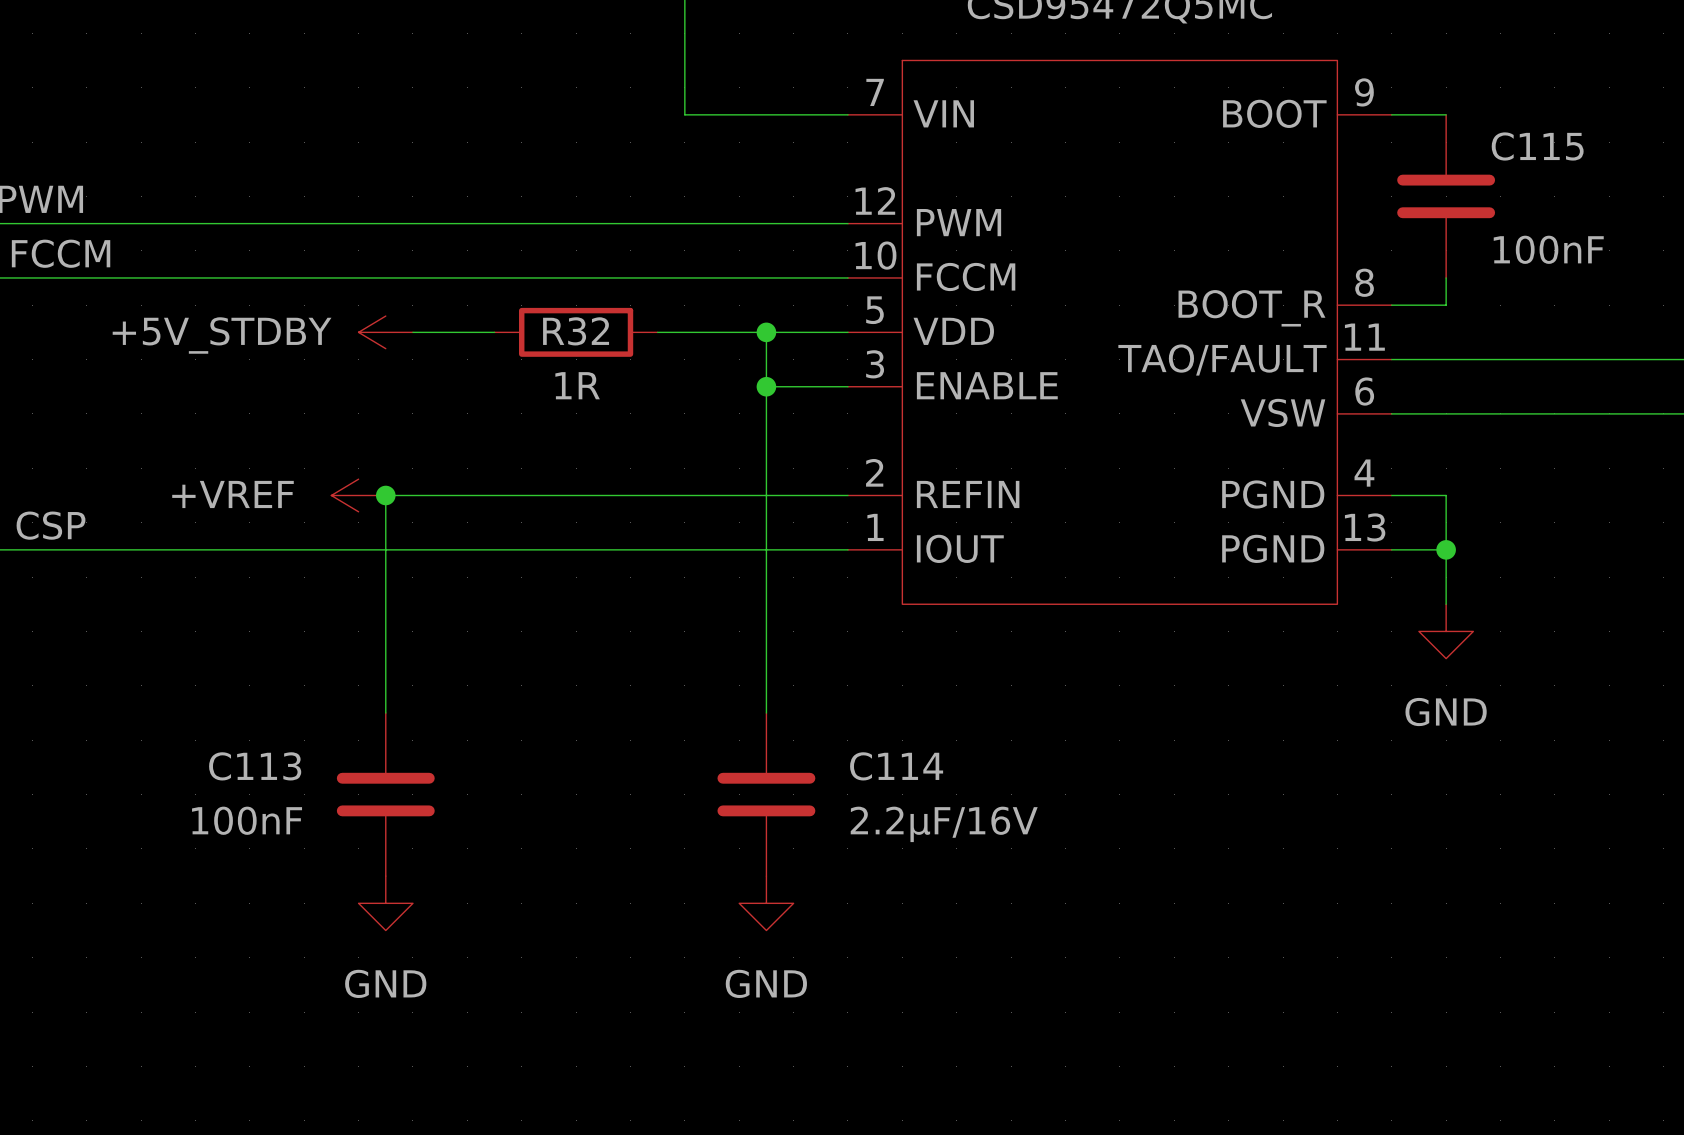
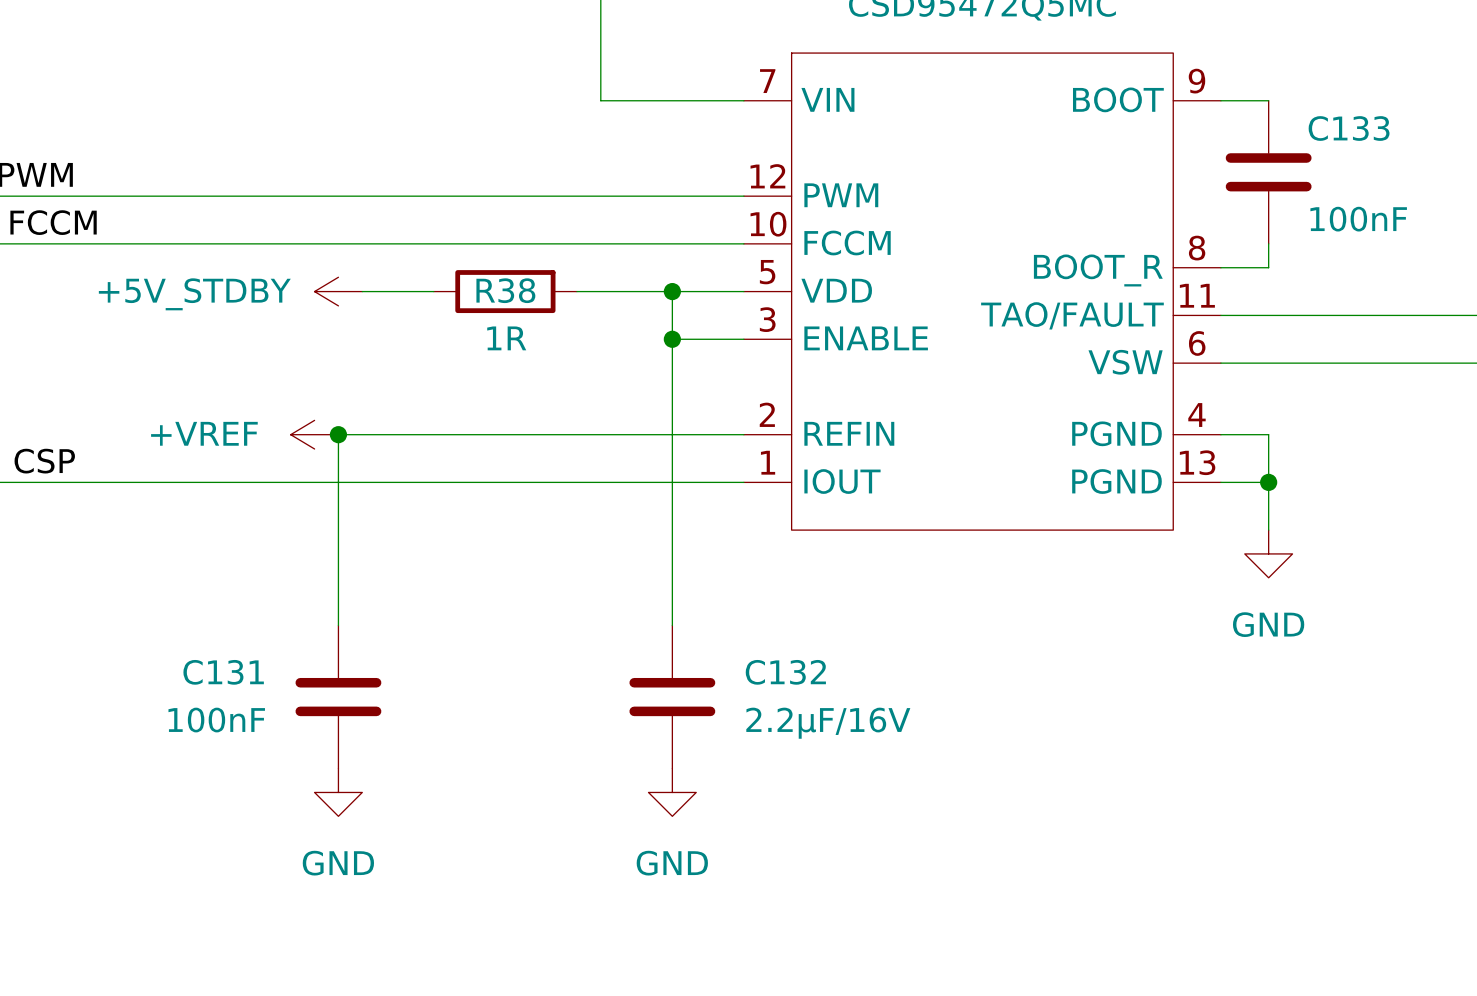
C115 name: C115 (1537, 146) -> C133 (1349, 128)
R32 name: R32 (576, 331) -> R38 (505, 290)
C113 name: C113 (255, 766) -> C131 (223, 672)
C114 name: C114 (896, 766) -> C132 (785, 672)

